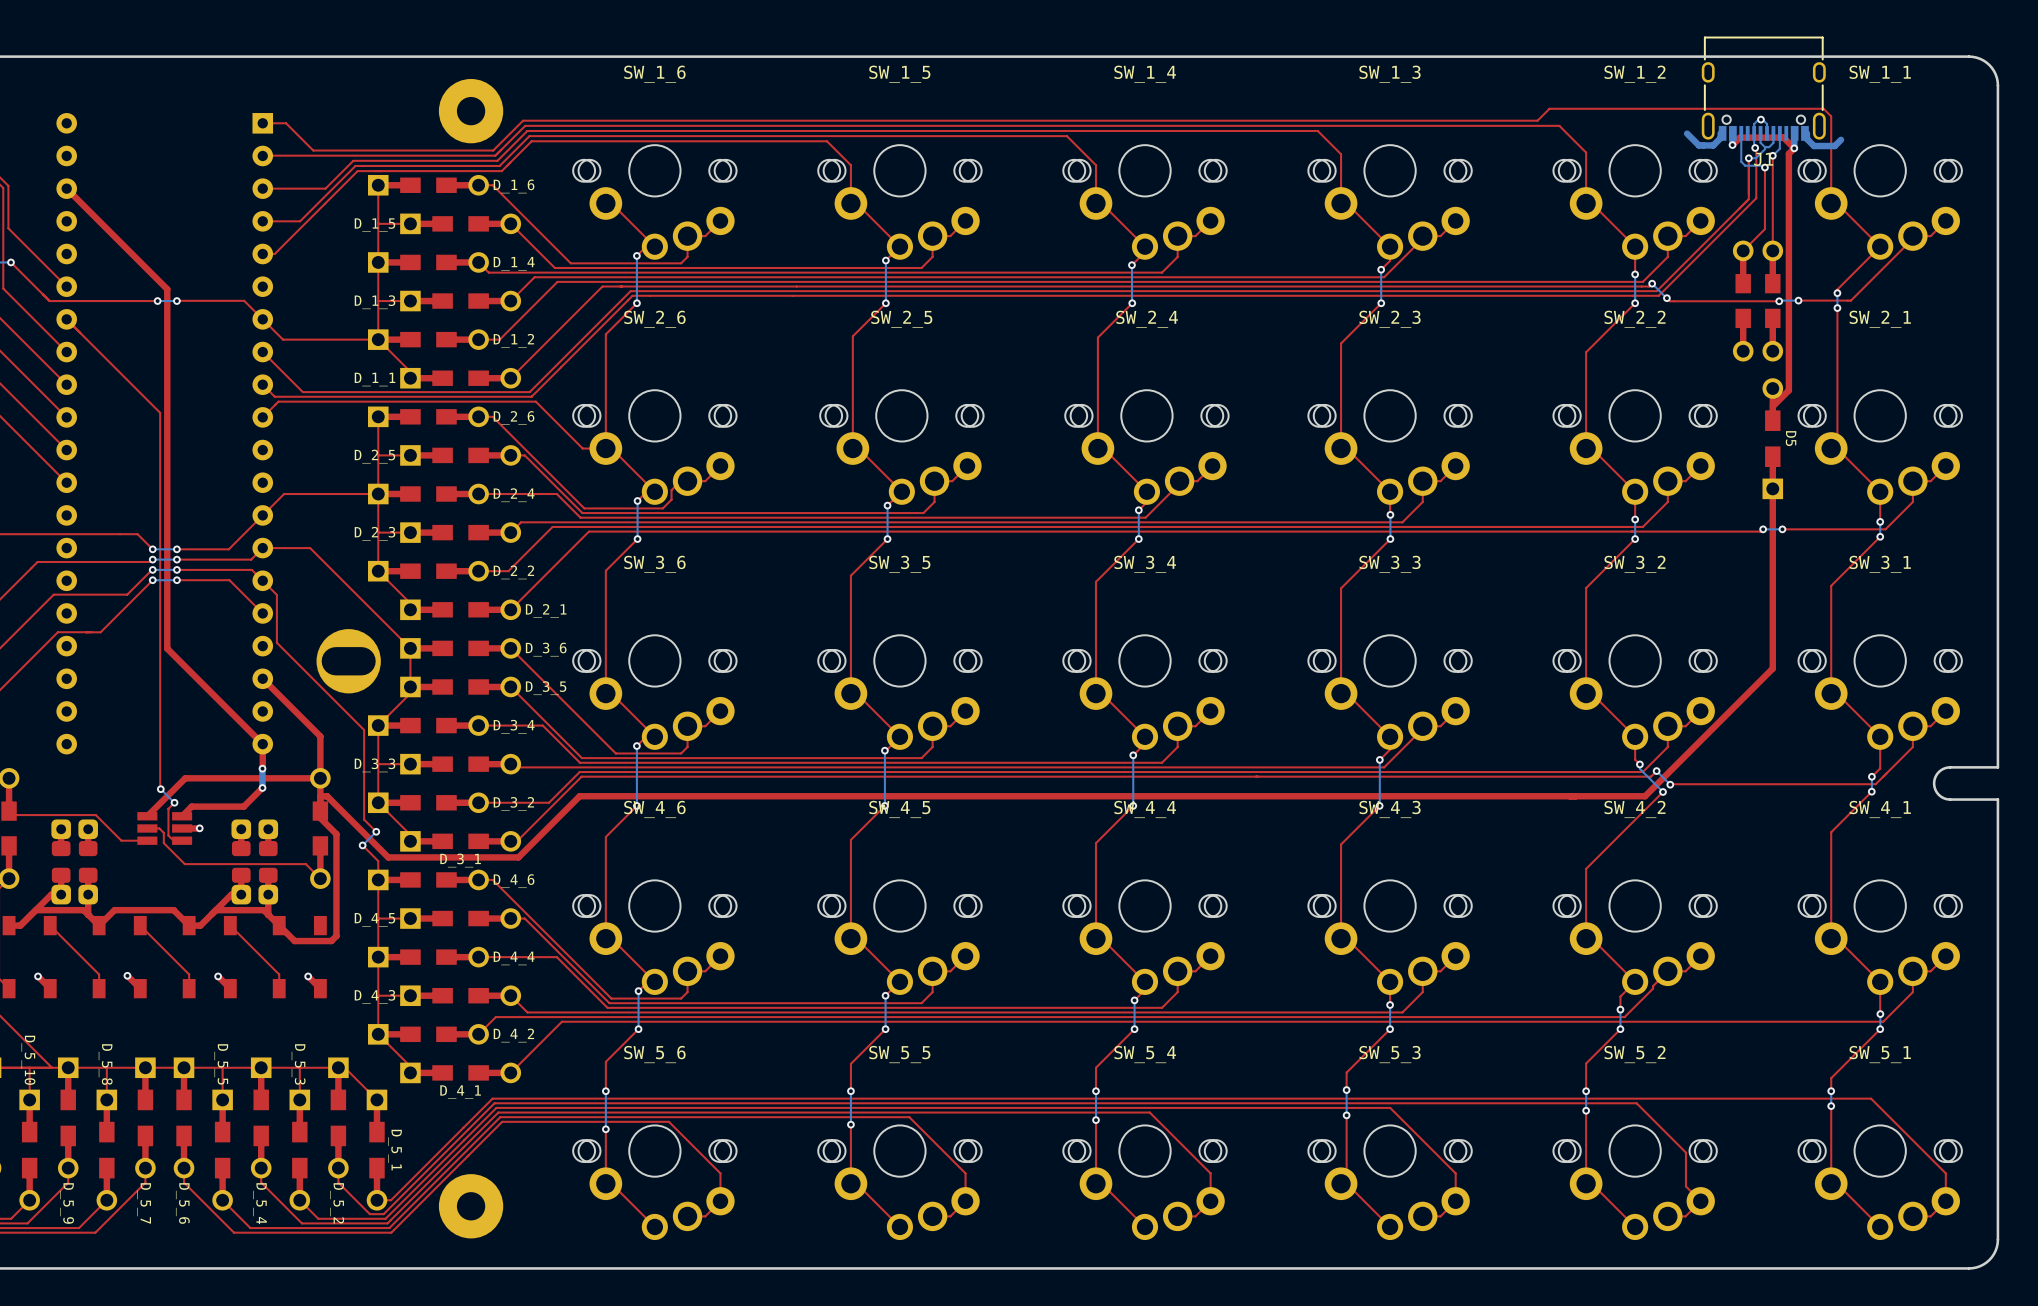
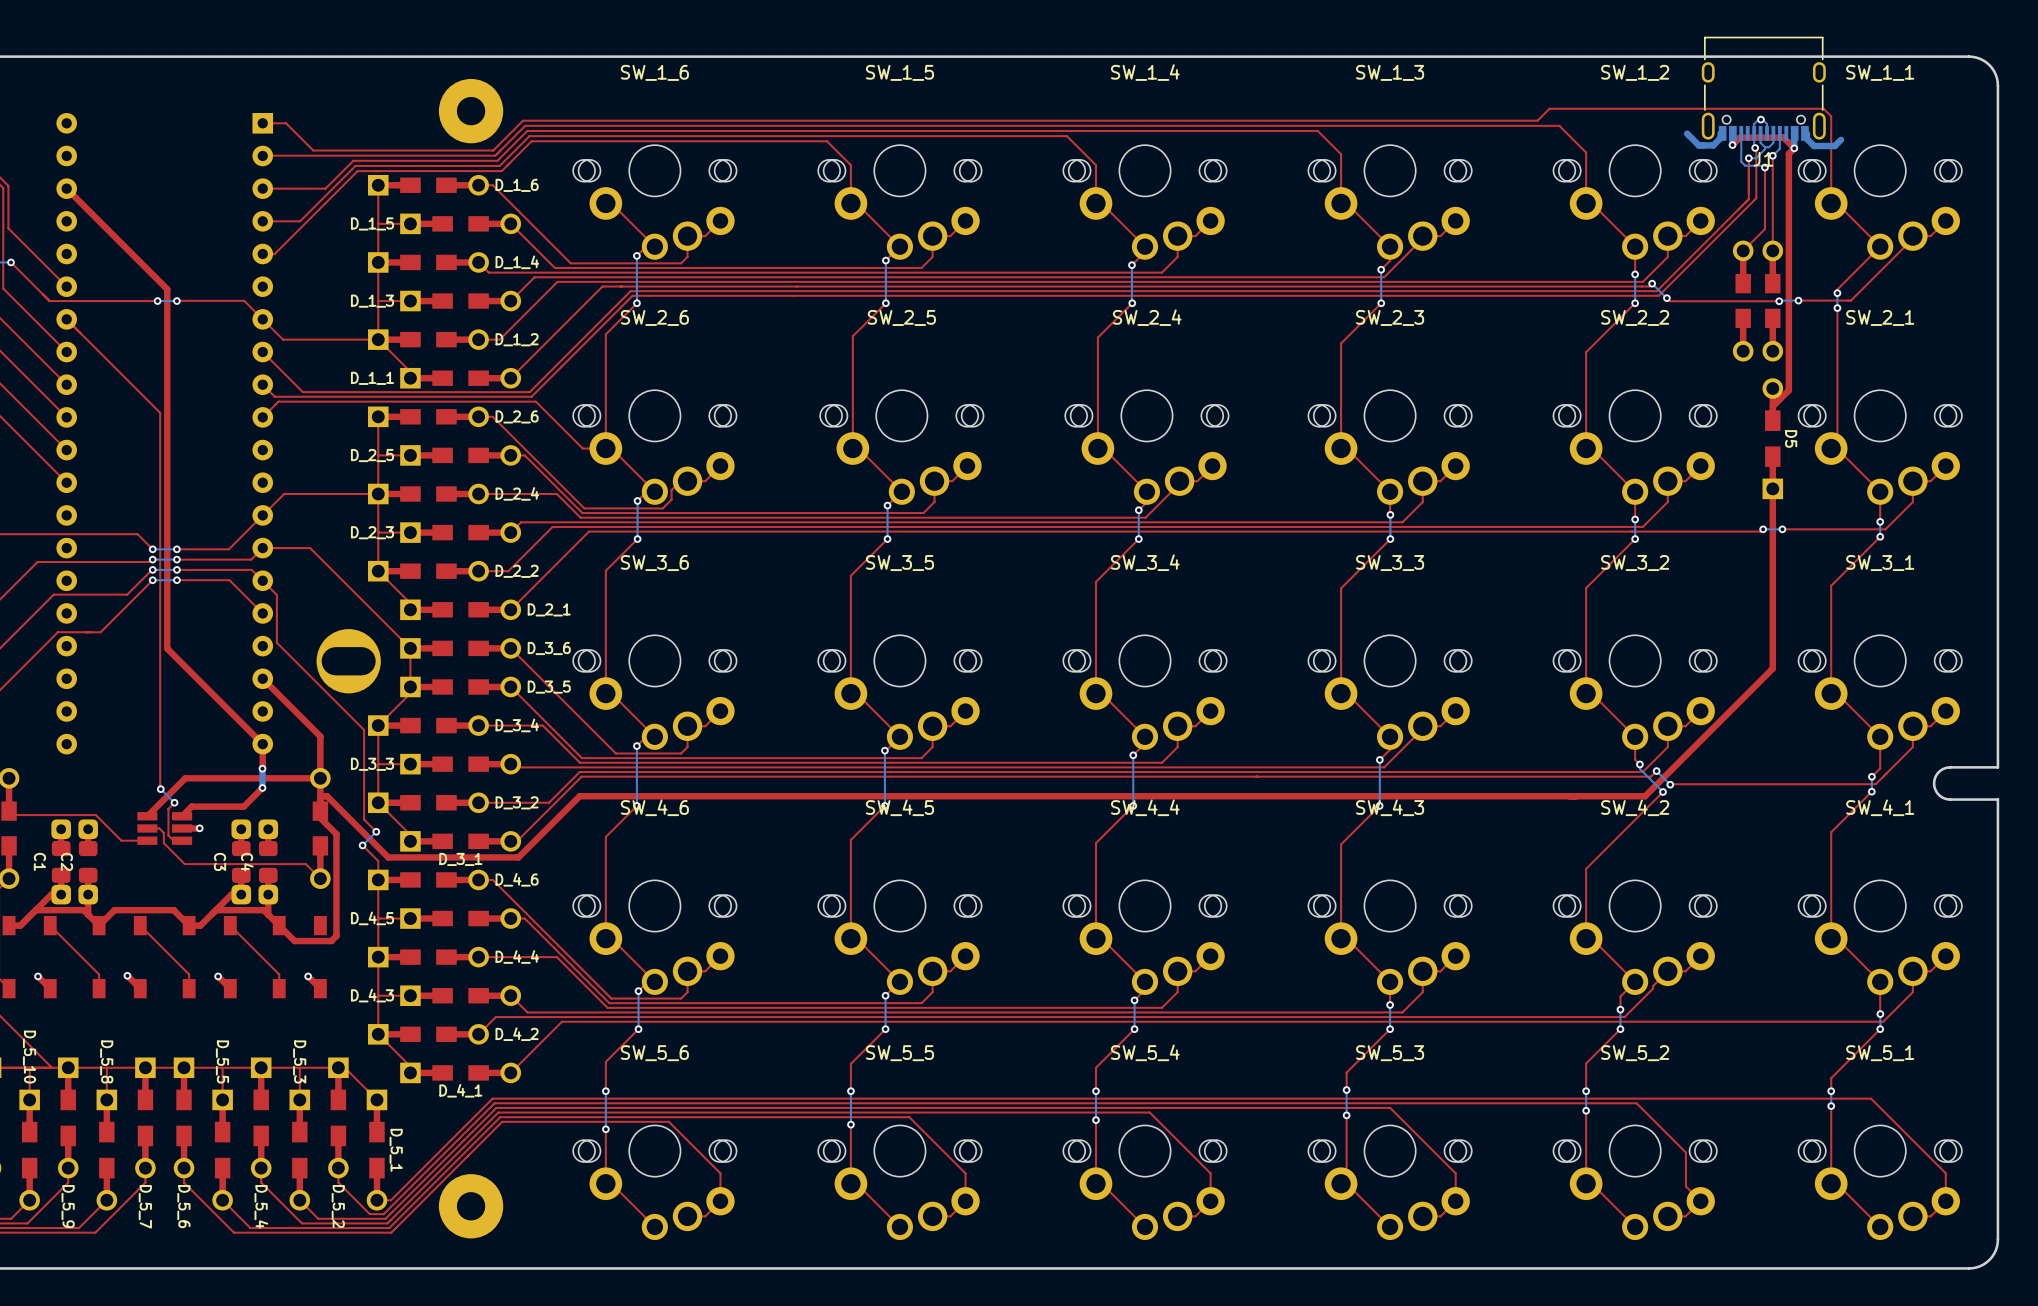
C1 name: none -> C1 (39, 861)
C2 name: none -> C2 (66, 861)
C3 name: none -> C3 (220, 861)
C4 name: none -> C4 (247, 862)

